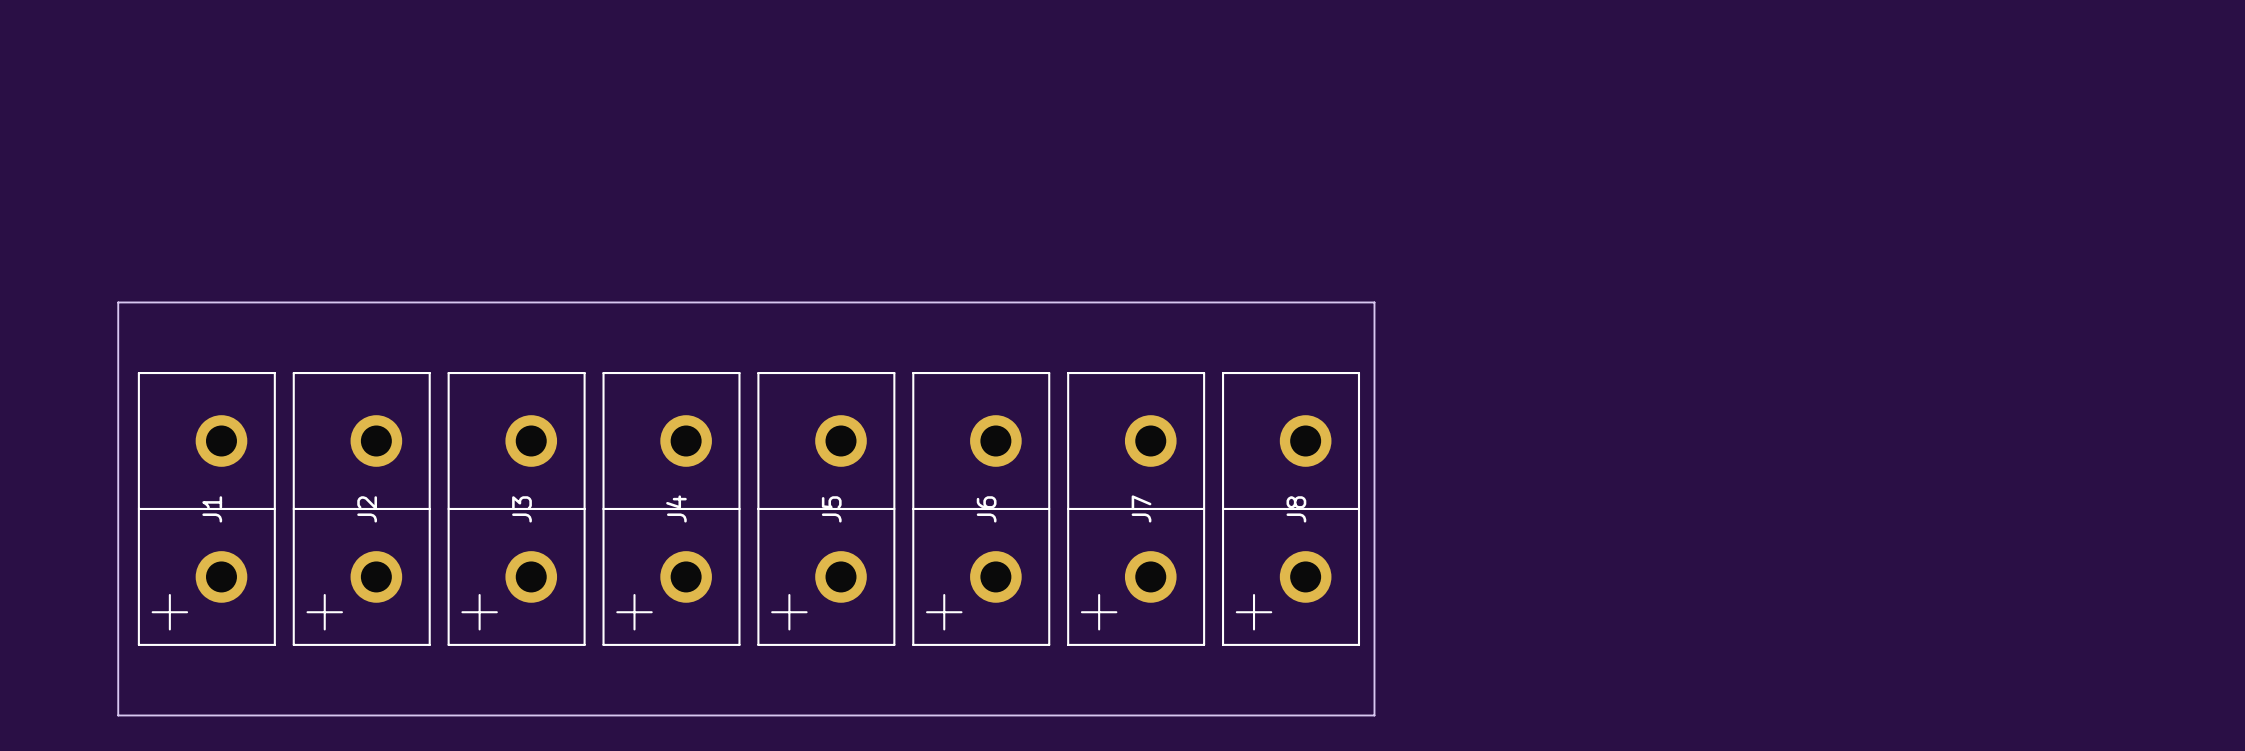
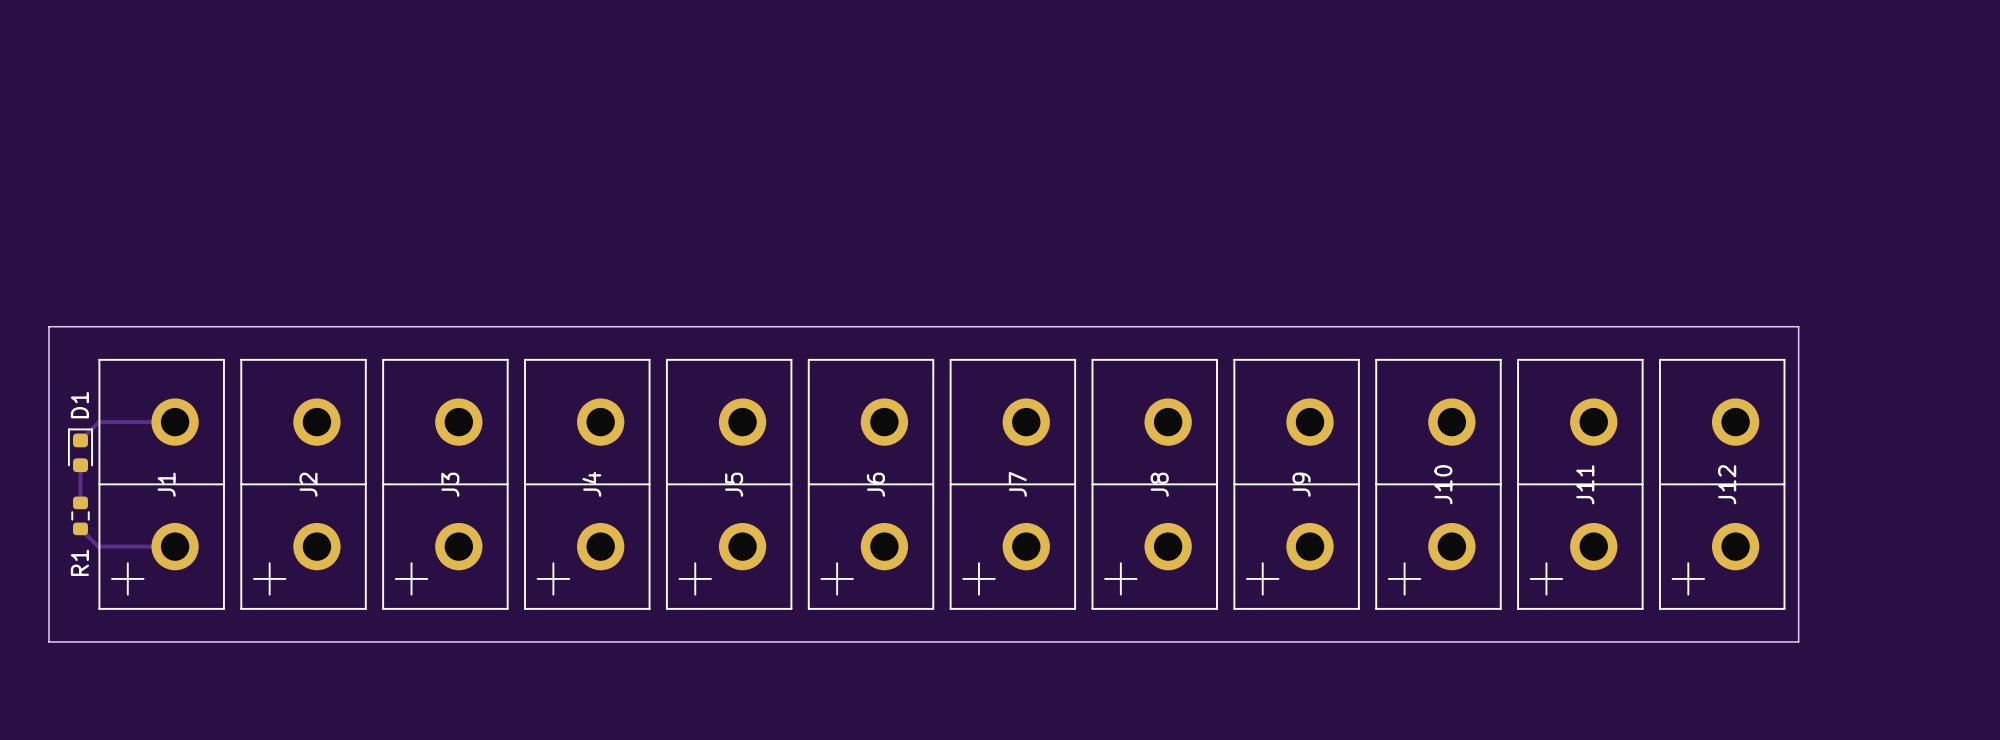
board edge: (118, 302) (1374, 302) (1374, 715) (118, 715) (118, 302) -> (48, 326) (48, 641) (1798, 641) (1798, 326) (48, 326)
track: none -> (175, 422) (98, 422) (80, 440)
D1: none -> (80, 450)
track: none -> (80, 465) (80, 502)
J9: none -> (1296, 484)
J10: none -> (1438, 484)
J11: none -> (1580, 484)
J12: none -> (1722, 484)
R1: none -> (80, 515)
track: none -> (80, 528) (98, 546) (175, 546)

